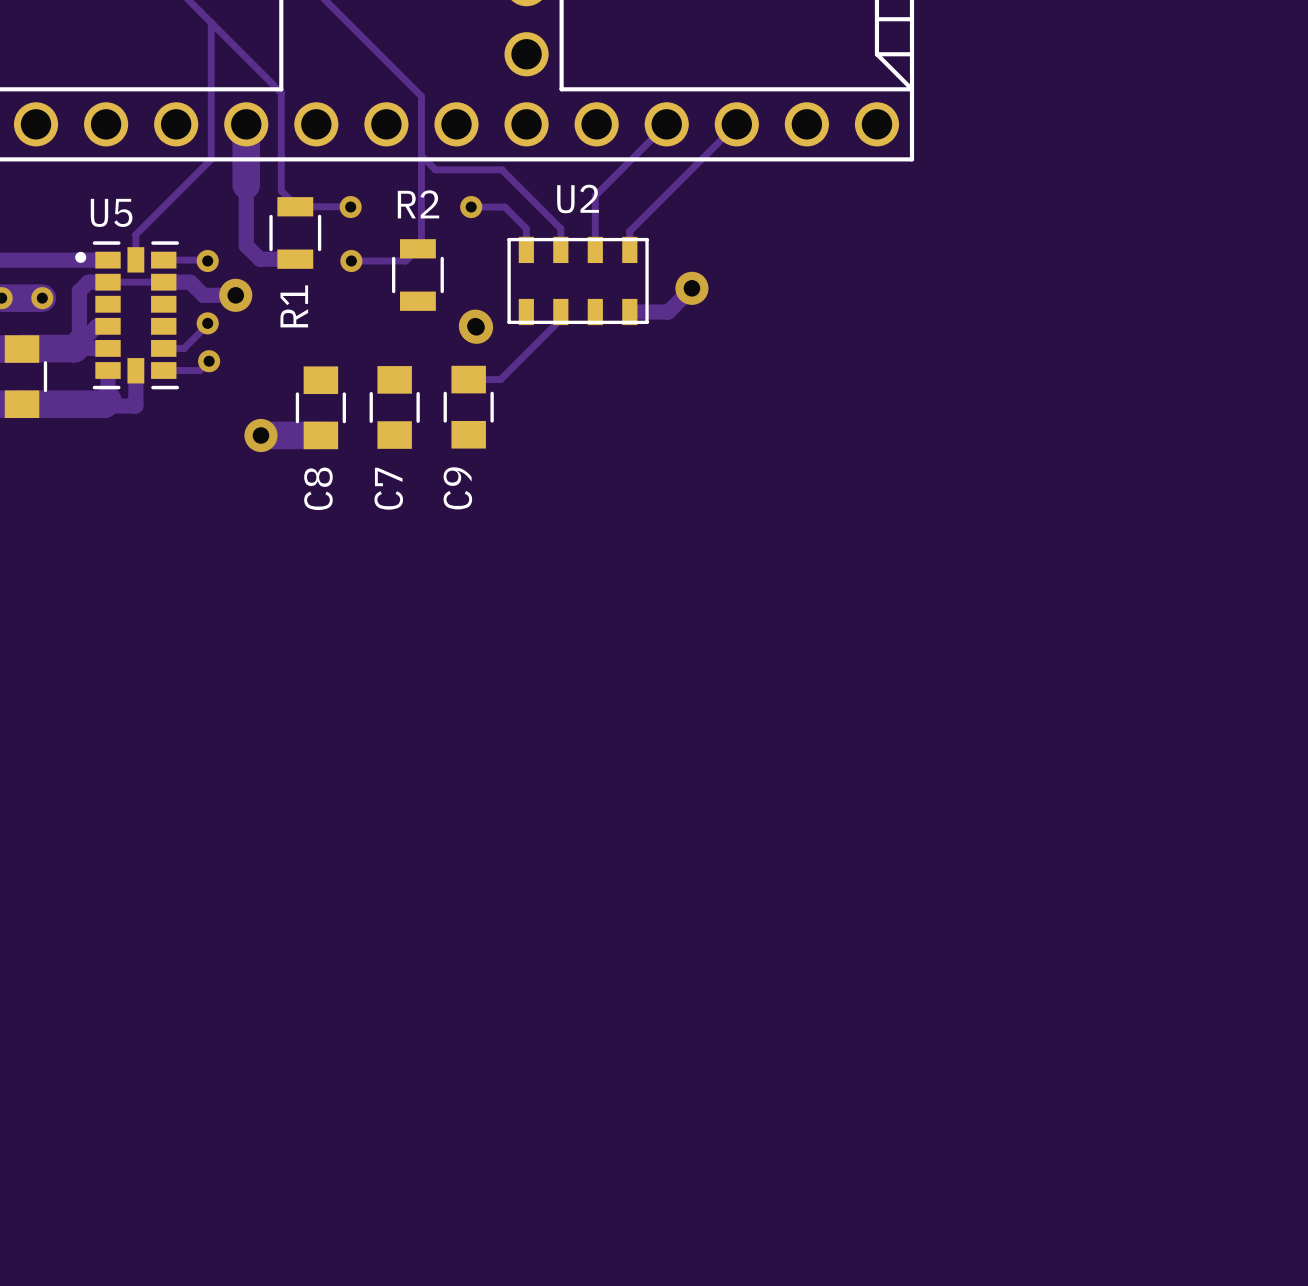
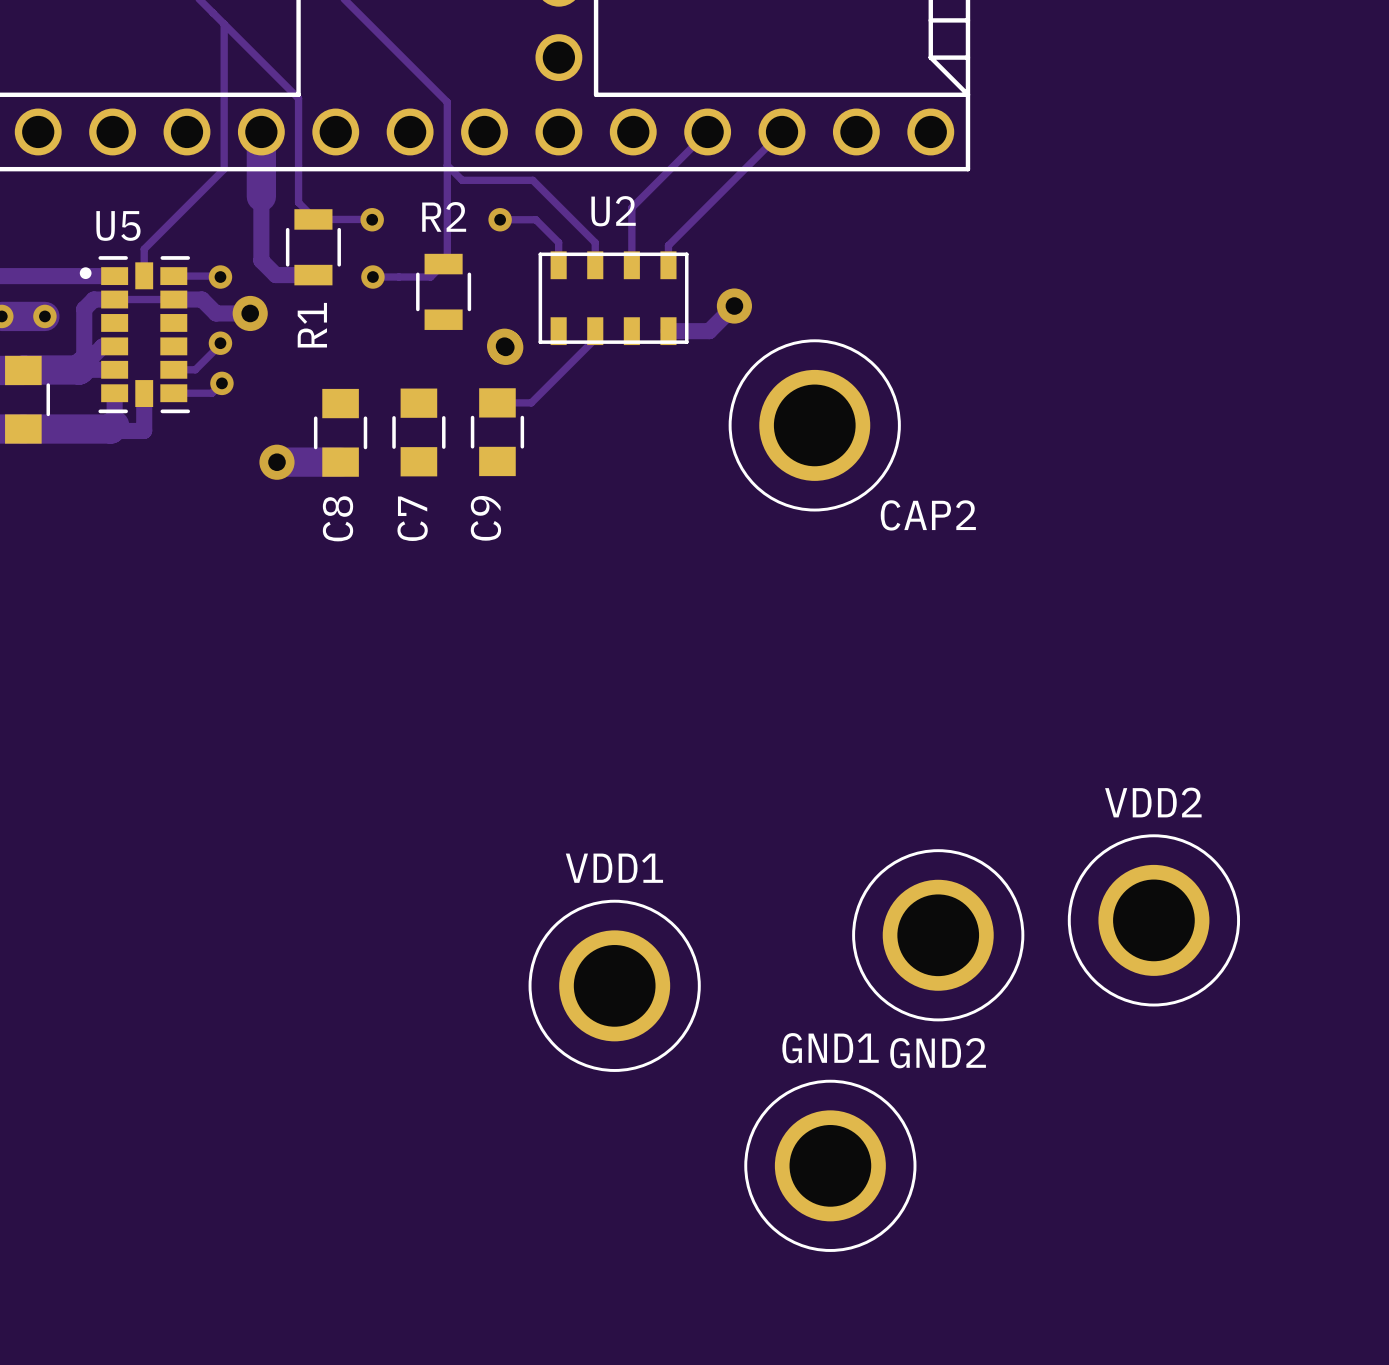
CAP2: none -> (814, 425)
VDD2: none -> (1153, 920)
GND2: none -> (938, 935)
VDD1: none -> (614, 985)
GND1: none -> (830, 1165)

